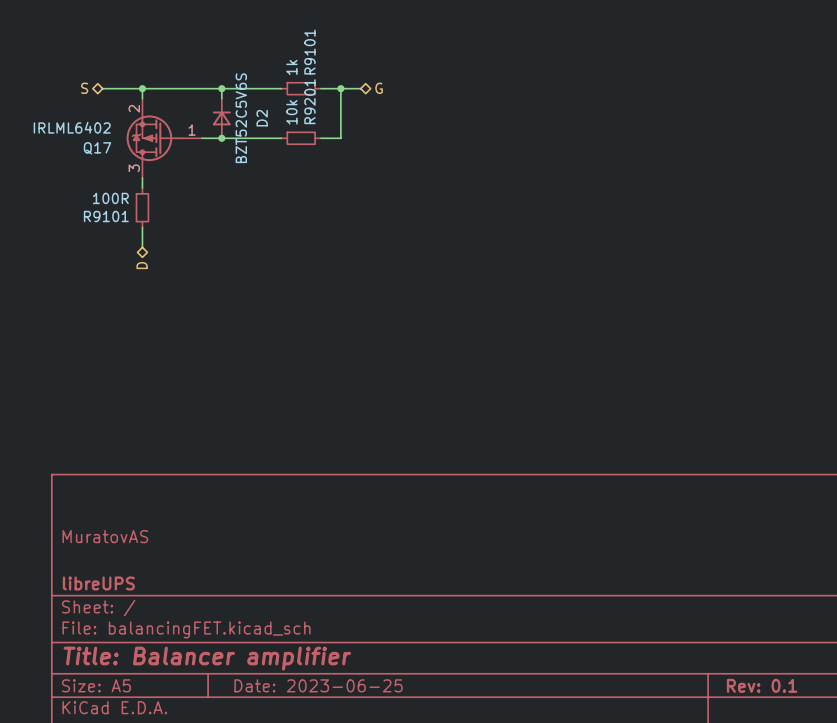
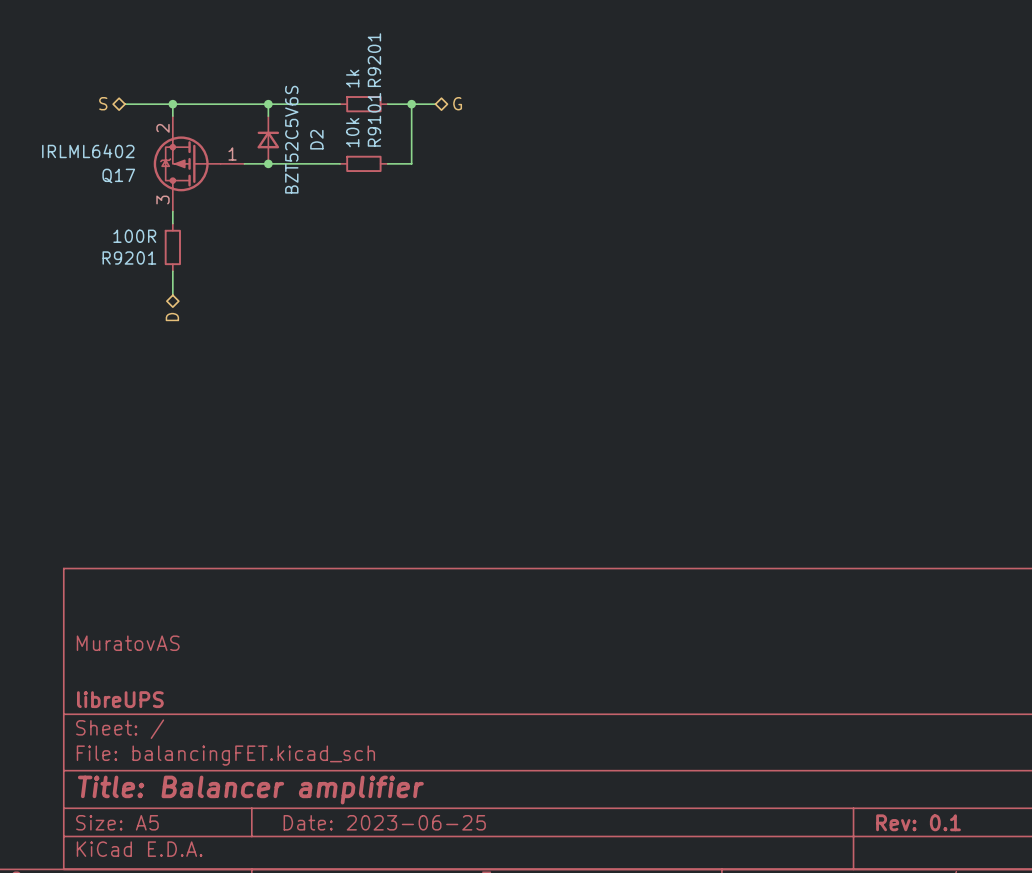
R9101 name: R9101 (309, 52) -> R9201 (374, 60)
R9201 name: R9201 (309, 101) -> R9101 (374, 119)
R9101 name: R9101 (106, 216) -> R9201 (129, 258)

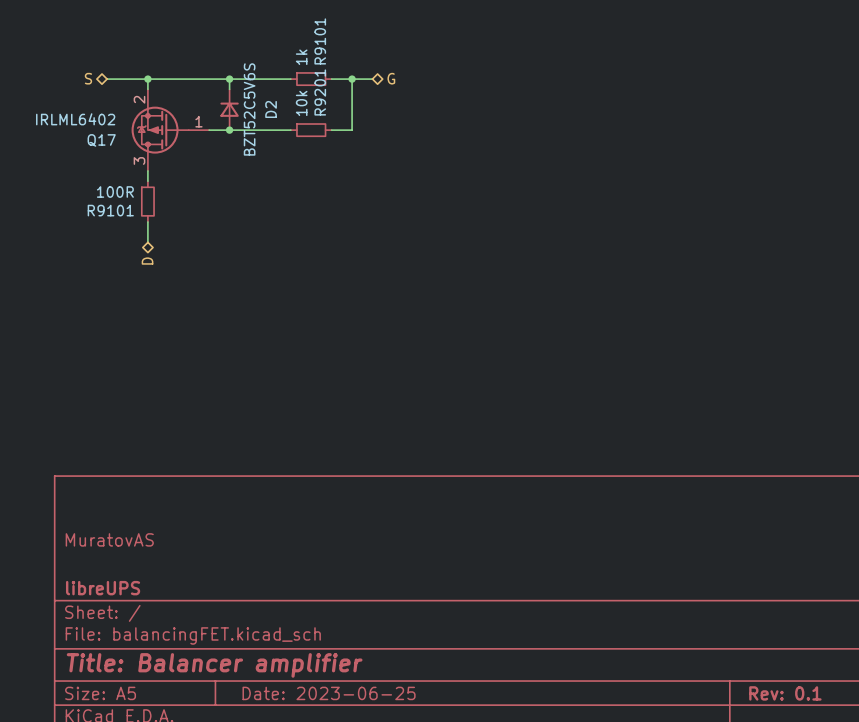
R9201 name: R9201 (374, 60) -> R9101 (320, 41)
R9101 name: R9101 (374, 119) -> R9201 (320, 92)
R9201 name: R9201 (129, 258) -> R9101 (110, 210)

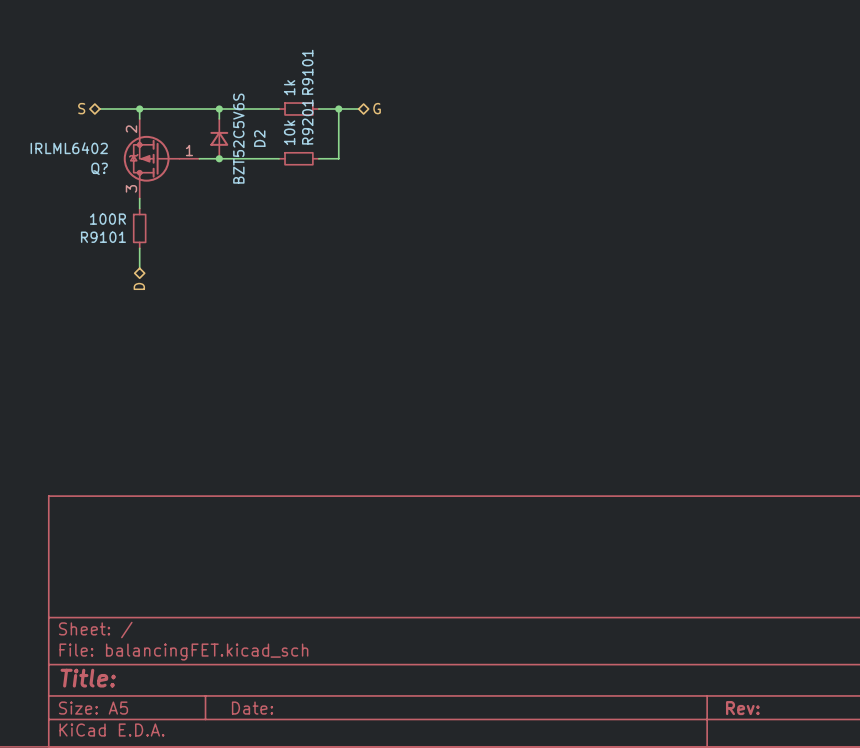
Q17 name: Q17 (101, 140) -> Q? (99, 168)
title block: MuratovAS (109, 539) -> none
title block: libreUPS (103, 588) -> none
title block: Title: Balancer amplifier (214, 665) -> Title: (88, 678)
title block: Date: 2023-06-25 (329, 693) -> Date: (252, 708)
title block: Rev: 0.1 (785, 693) -> Rev: (742, 708)

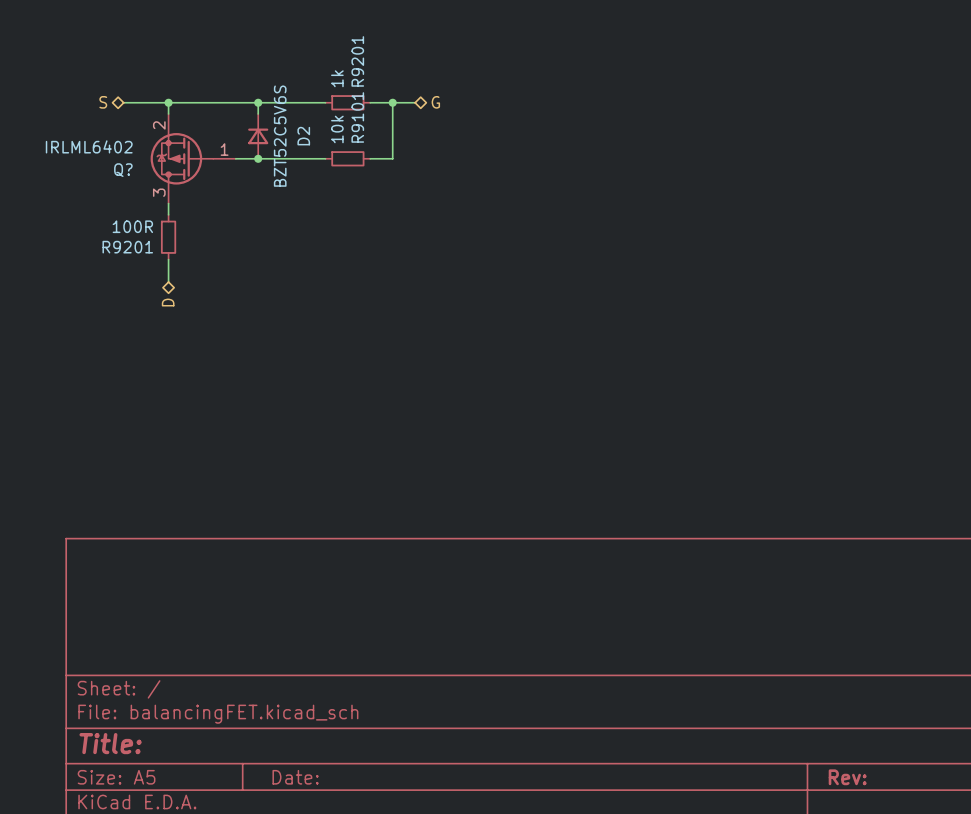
R9101 name: R9101 (307, 72) -> R9201 (357, 61)
R9201 name: R9201 (307, 122) -> R9101 (357, 117)
R9101 name: R9101 (103, 237) -> R9201 (127, 247)

